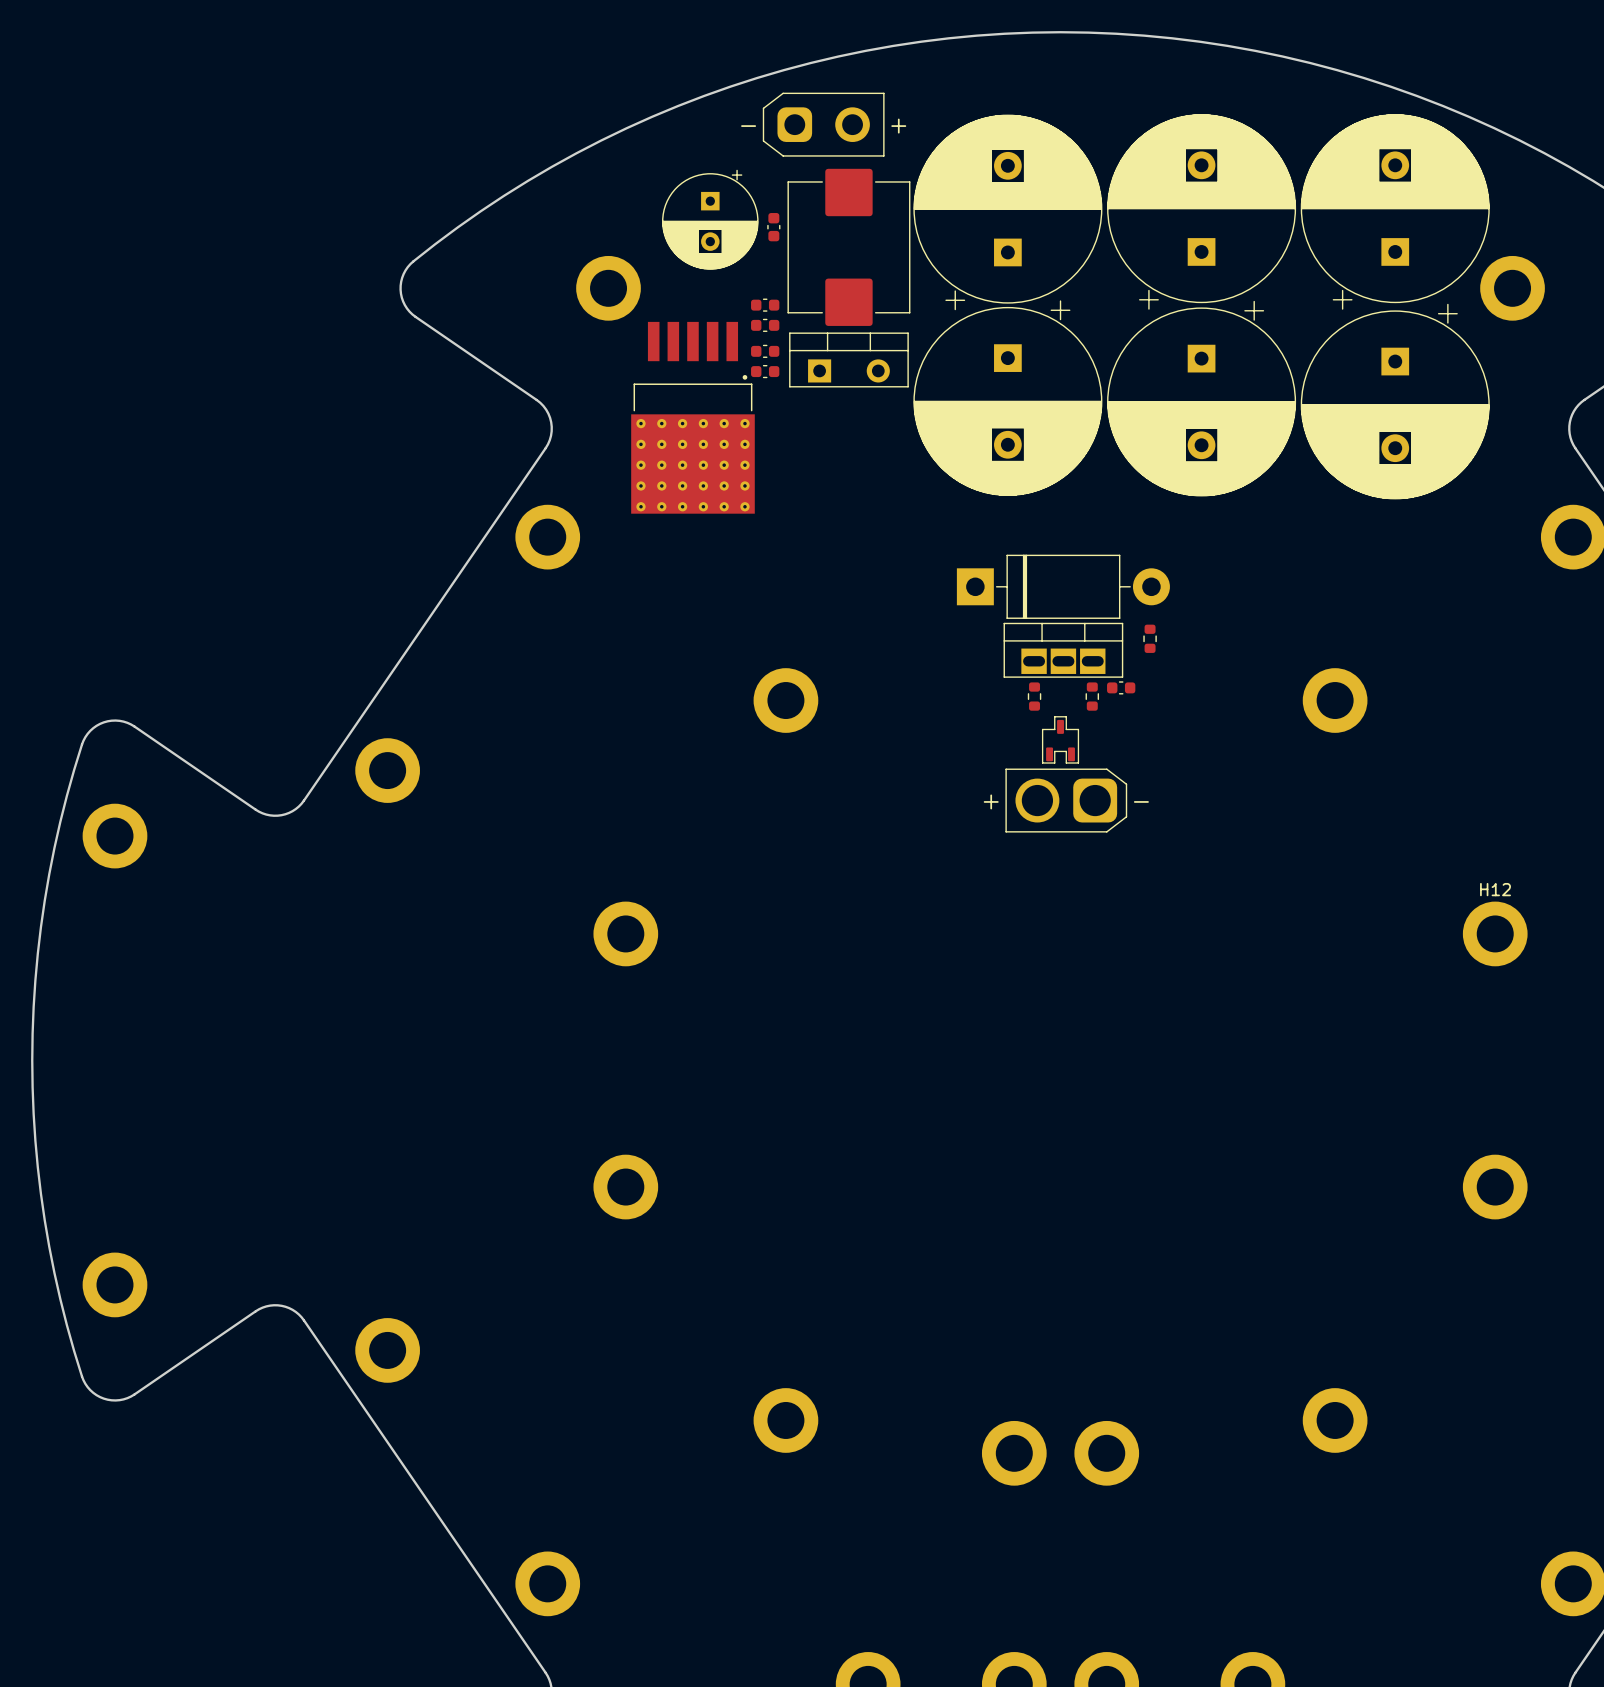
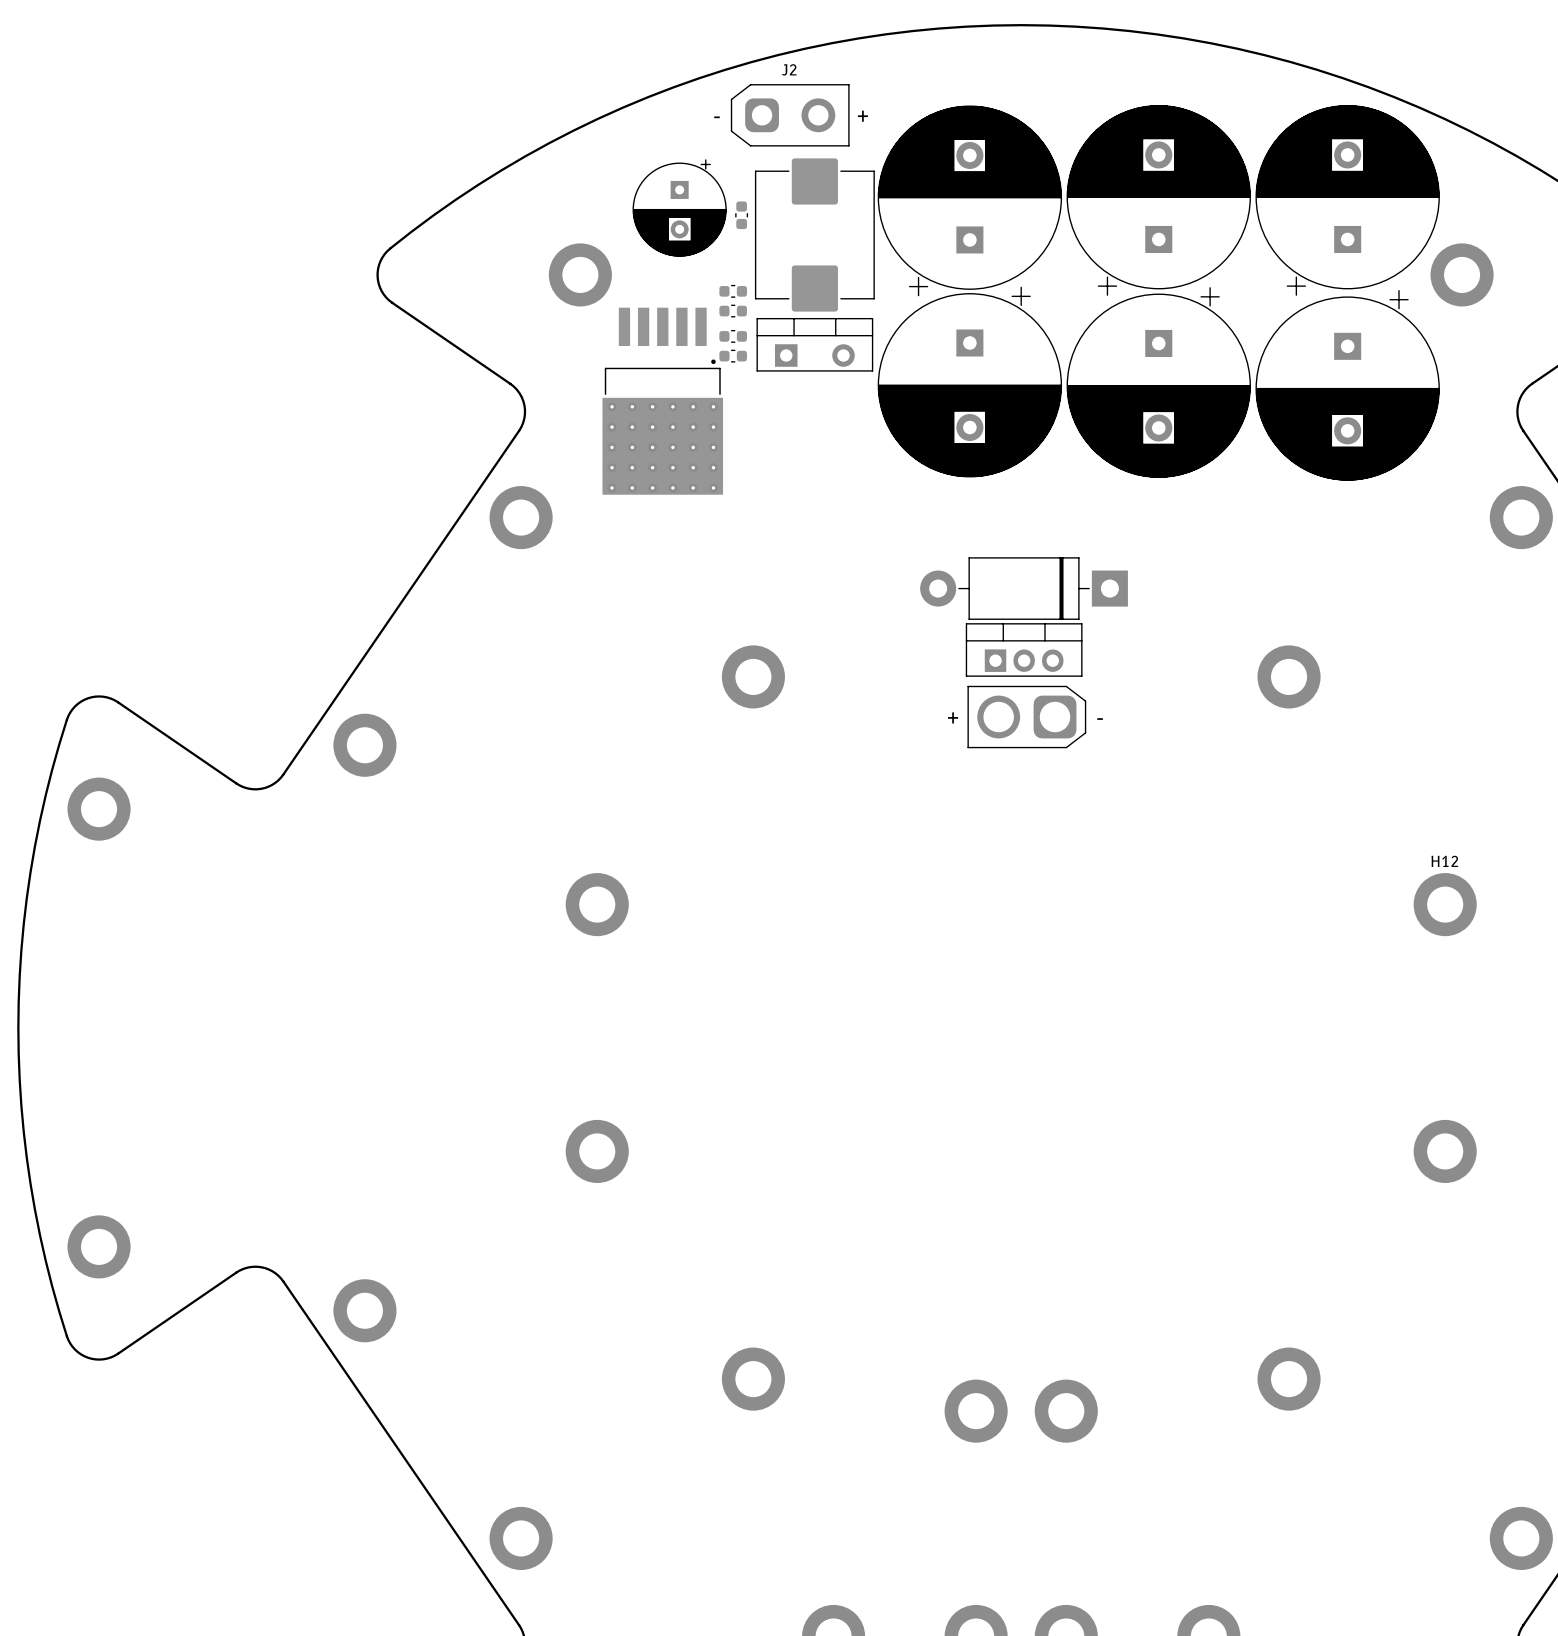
J2 name: none -> J2 (789, 69)
part rotation: 0° (1063, 586) -> 180° (1024, 588)
part: (1150, 638) -> none
part: (1063, 650) -> none
part: none -> (1024, 649)
part: (1121, 687) -> none
part: (1034, 696) -> none
part: (1092, 696) -> none
part footprint: [1042, 716, 1080, 764] -> [967, 685, 1087, 749]
part: (1066, 800) -> none

